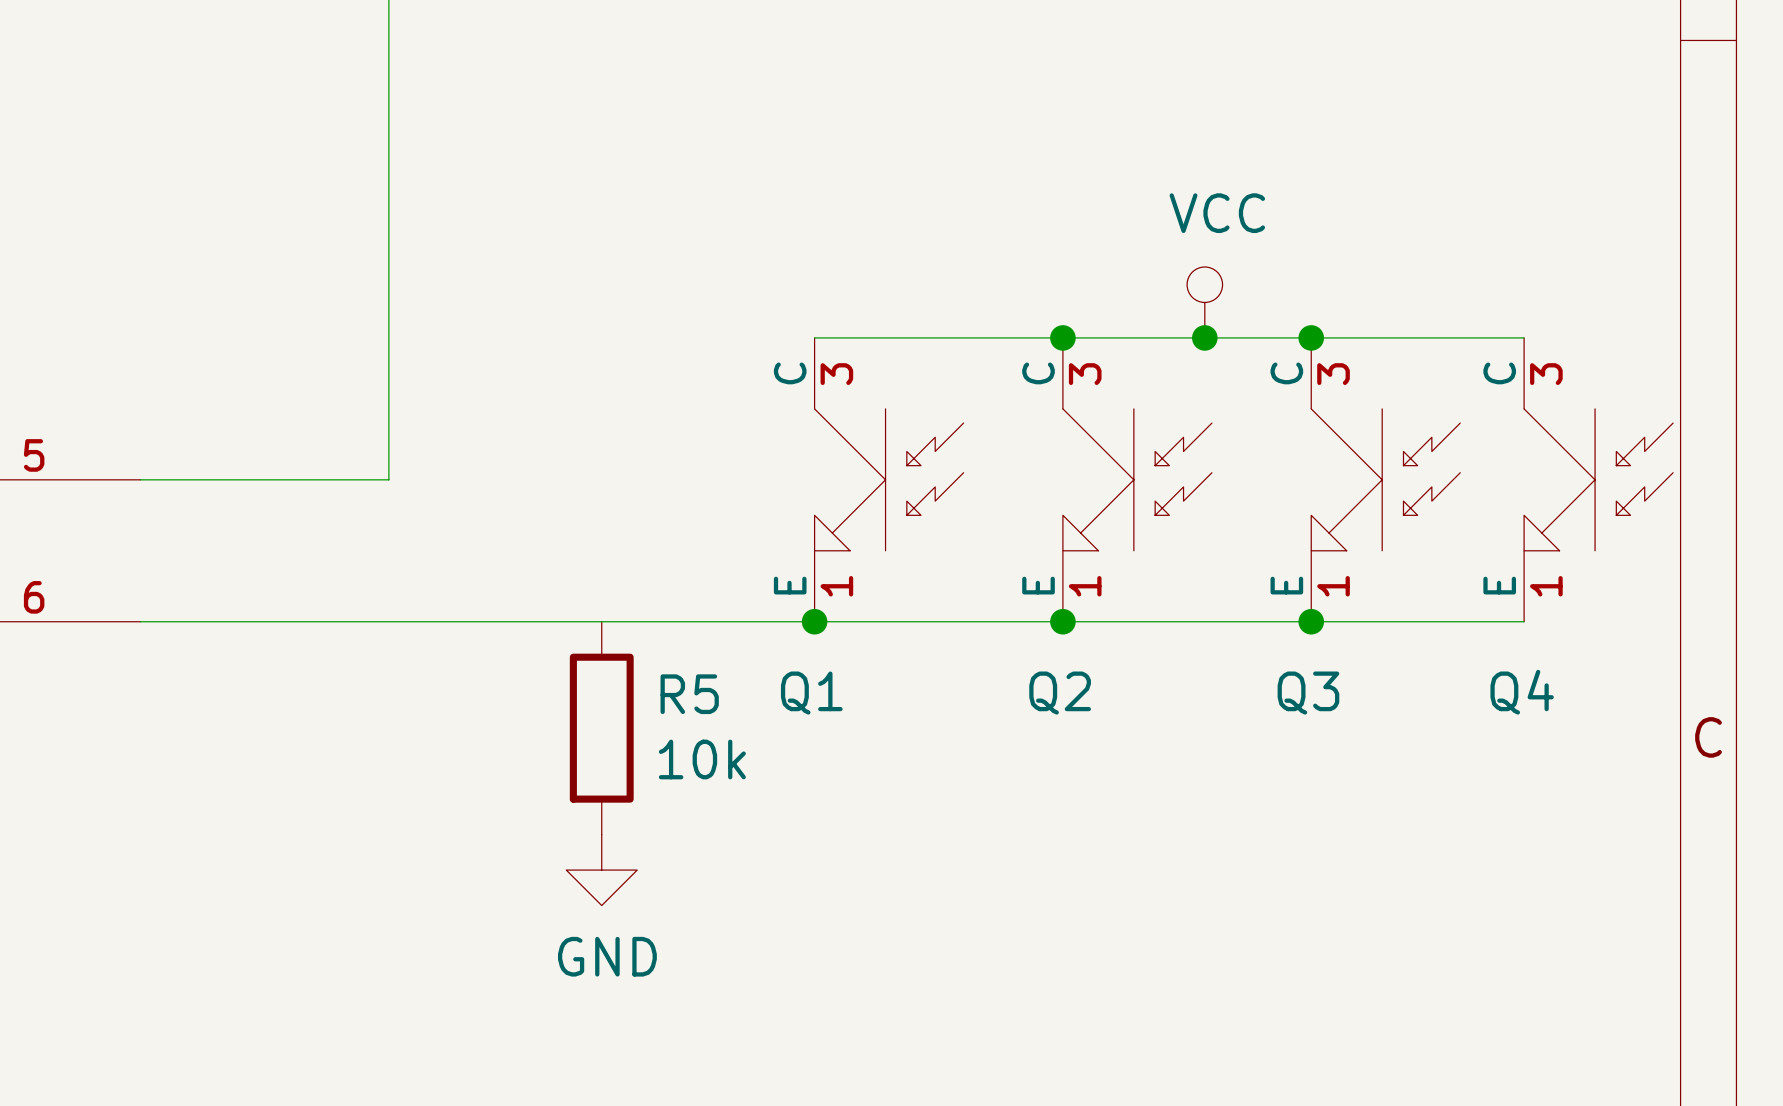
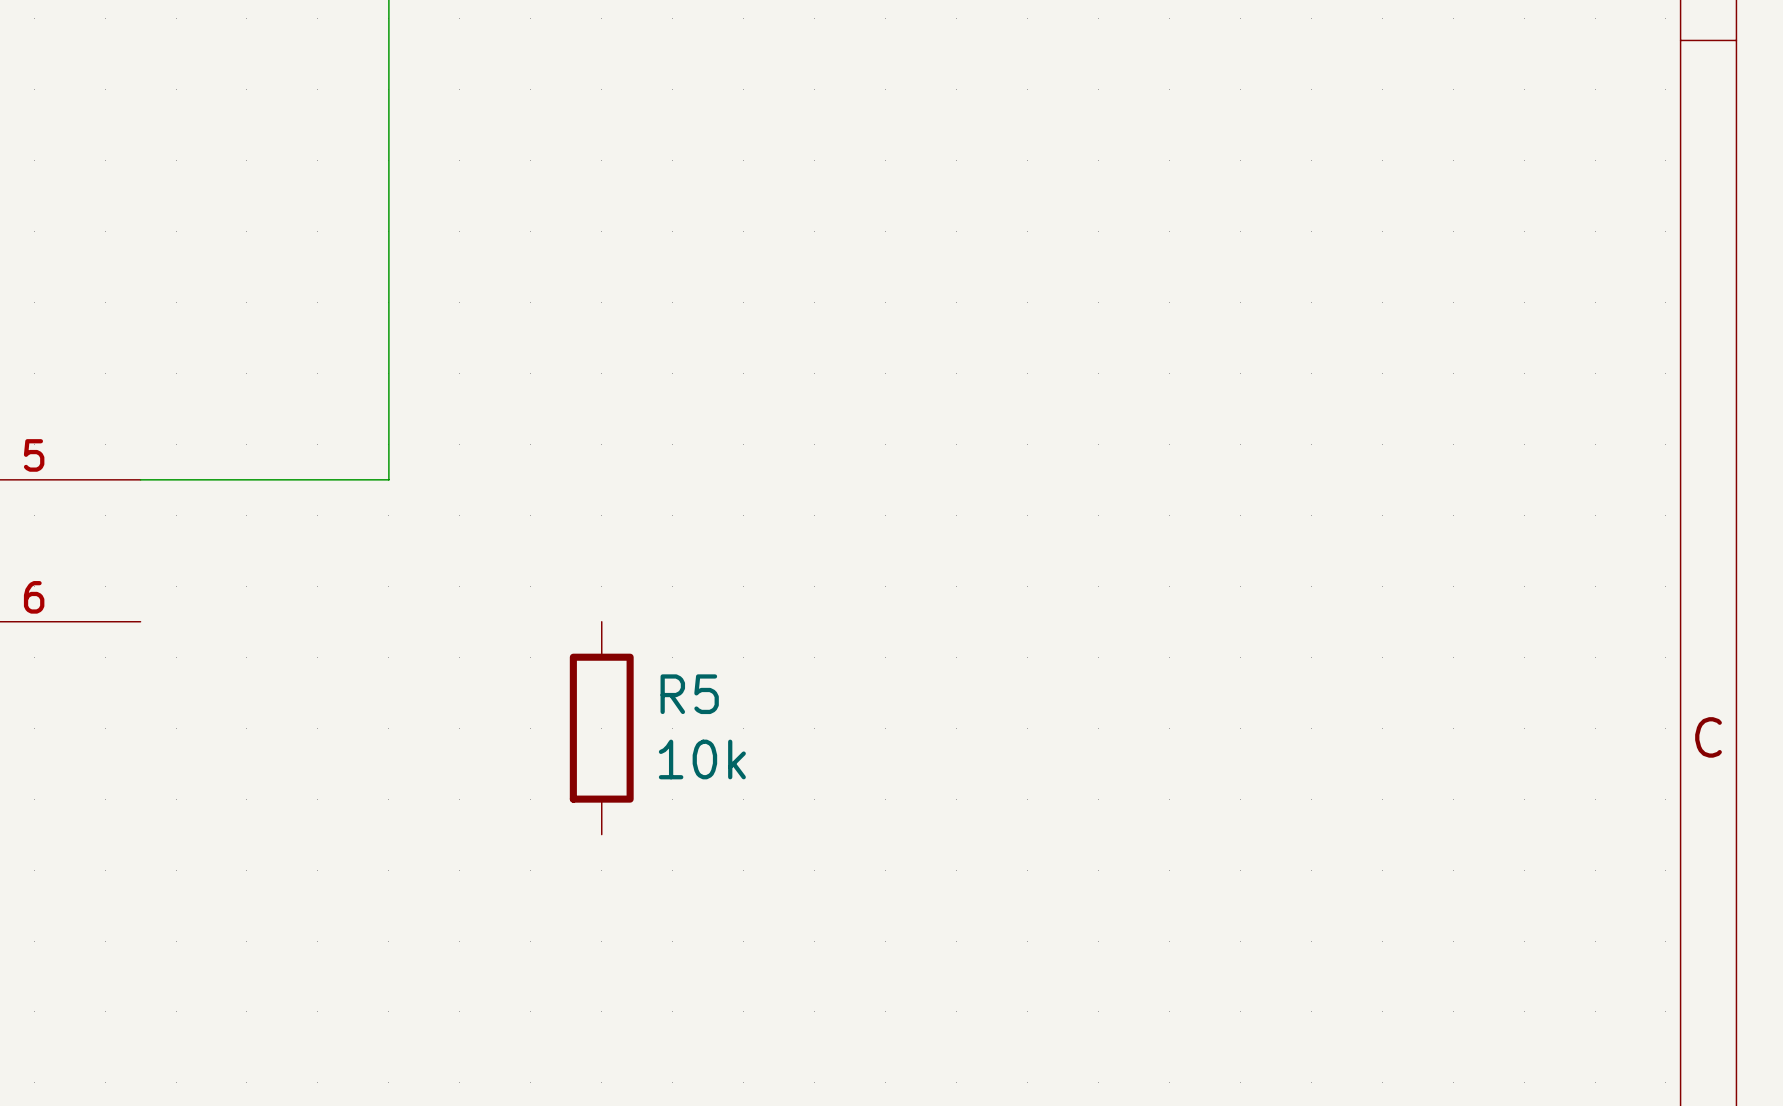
power symbol: VCC (1204, 302) -> none
wire: (814, 337) (1524, 337) -> none
junction: (1062, 337) -> none
junction: (1204, 337) -> none
junction: (1311, 337) -> none
Q1: (889, 479) -> none
Q2: (1137, 479) -> none
Q3: (1385, 479) -> none
Q4: (1598, 479) -> none
wire: (140, 621) (1524, 621) -> none
junction: (814, 621) -> none
junction: (1062, 621) -> none
junction: (1311, 621) -> none
power symbol: GND (601, 870) -> none

